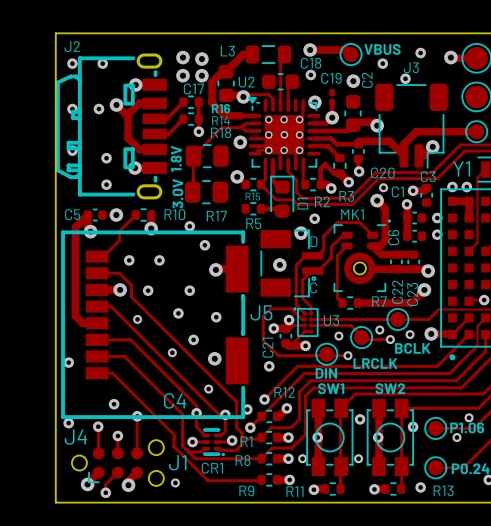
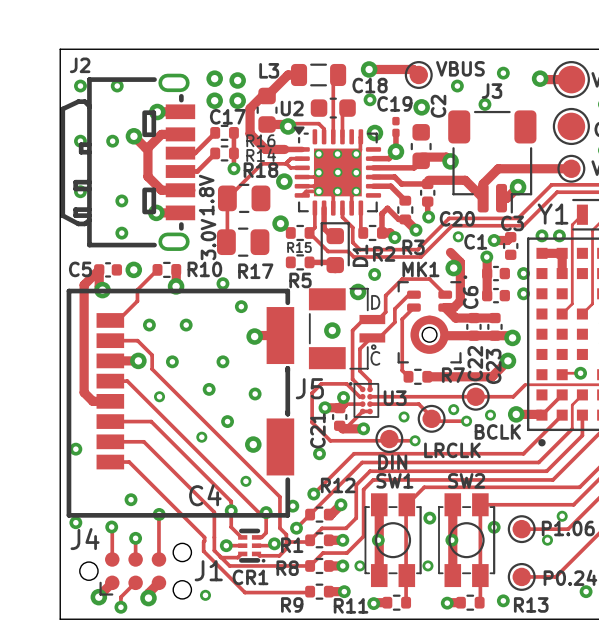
via position: (377, 200) -> (453, 268)

